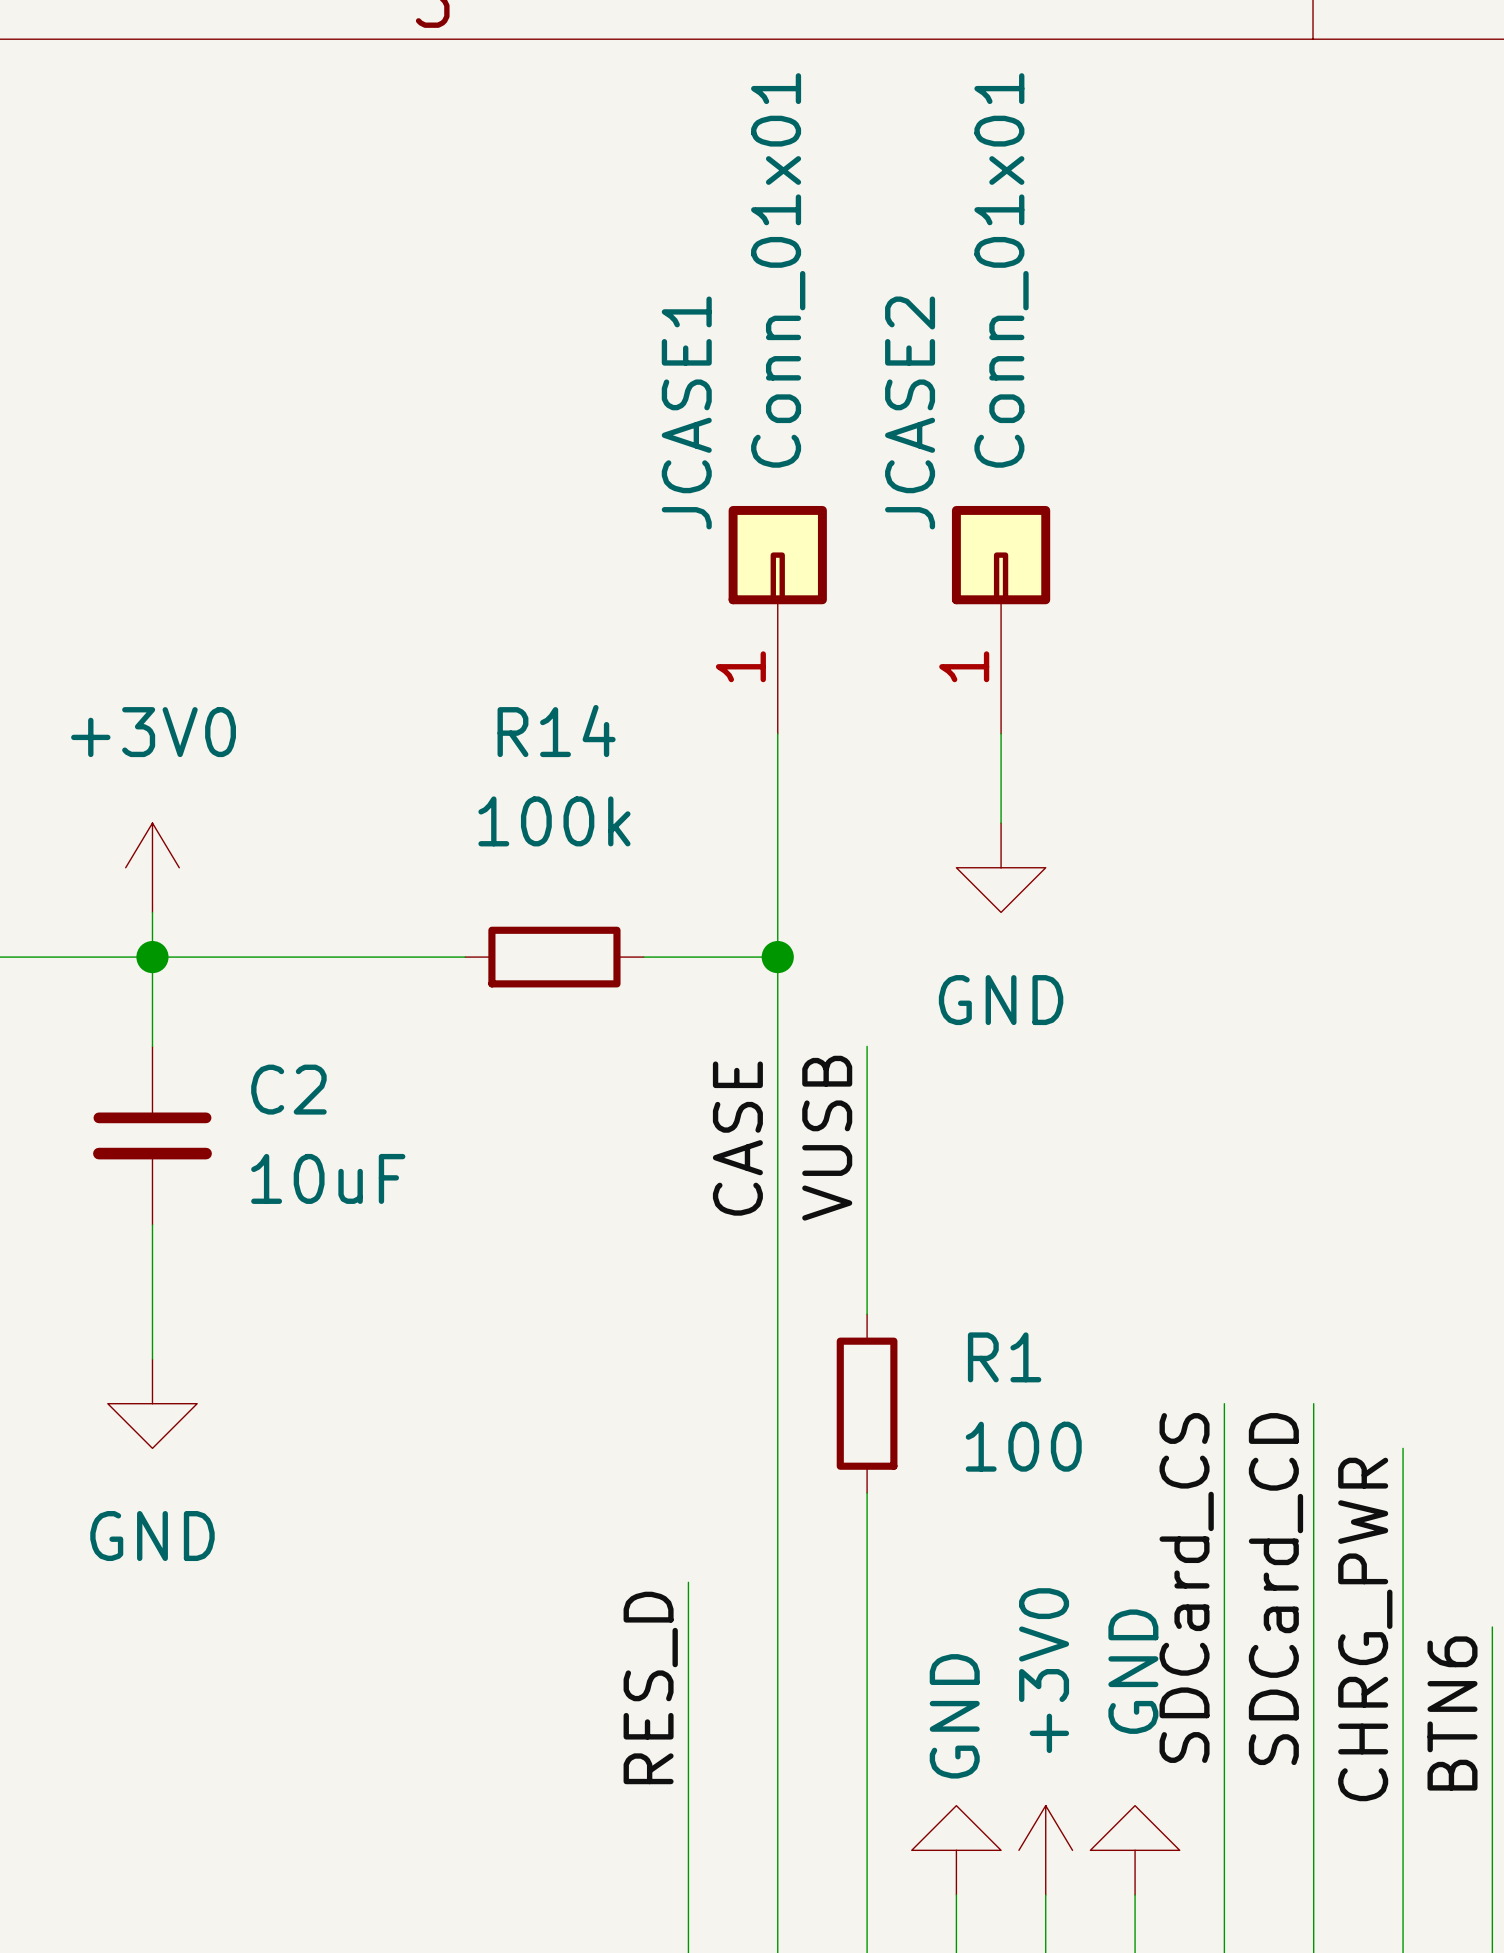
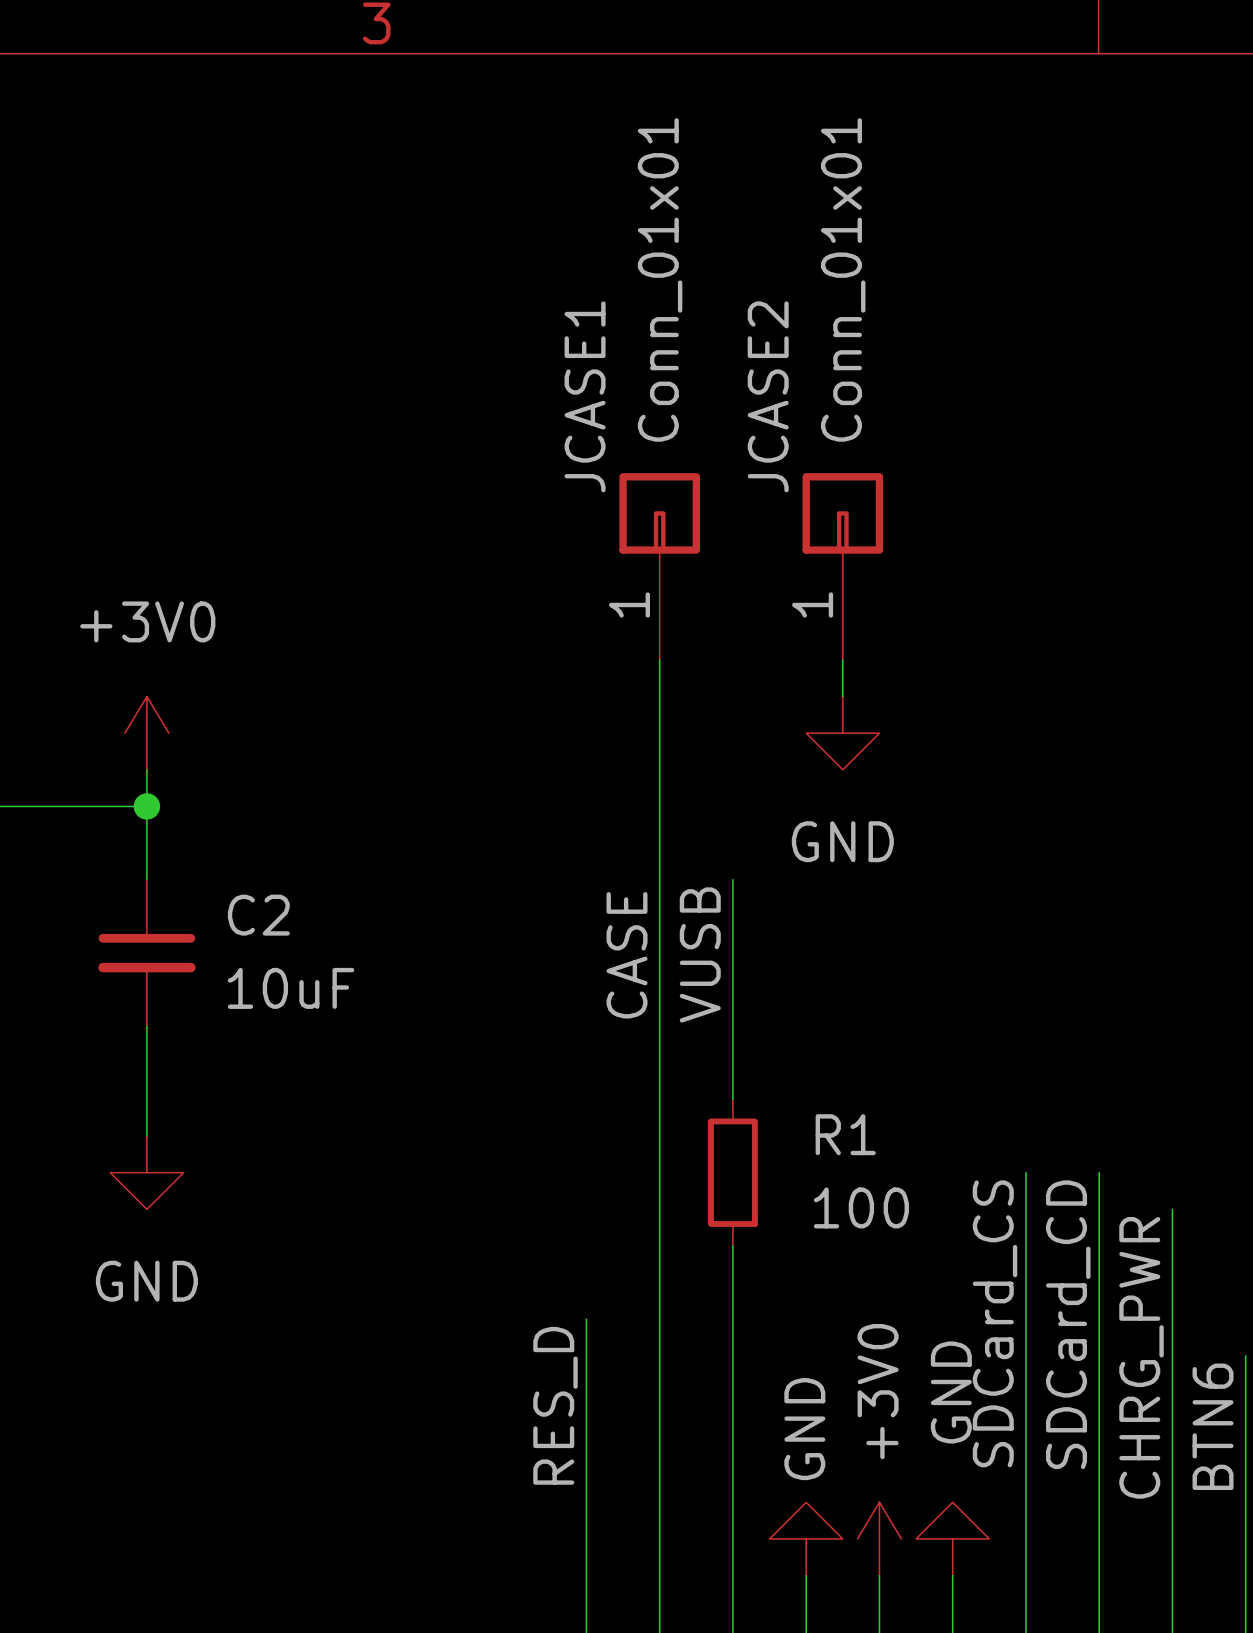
JCASE1 position: (777, 619) -> (659, 566)
JCASE2 position: (1001, 619) -> (842, 566)
wire: (152, 957) (465, 957) -> none
R14: 100k (554, 957) -> none
wire: (643, 957) (777, 957) -> none
junction: (777, 957) -> none

